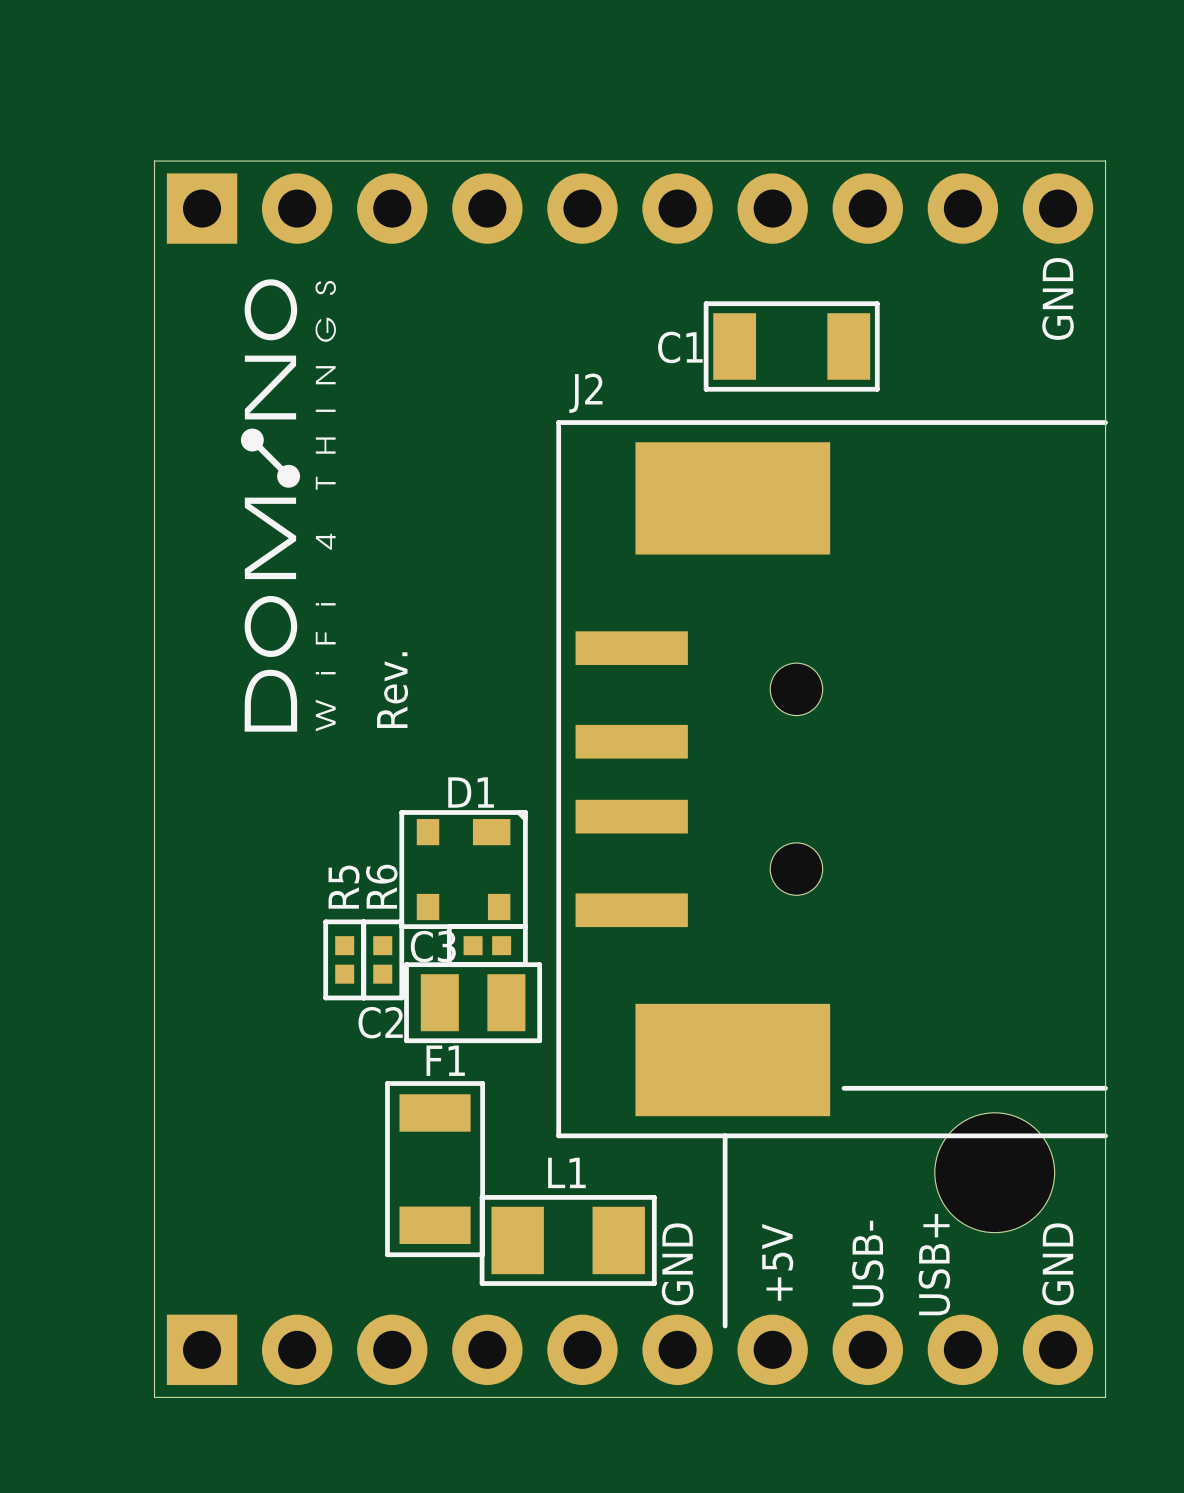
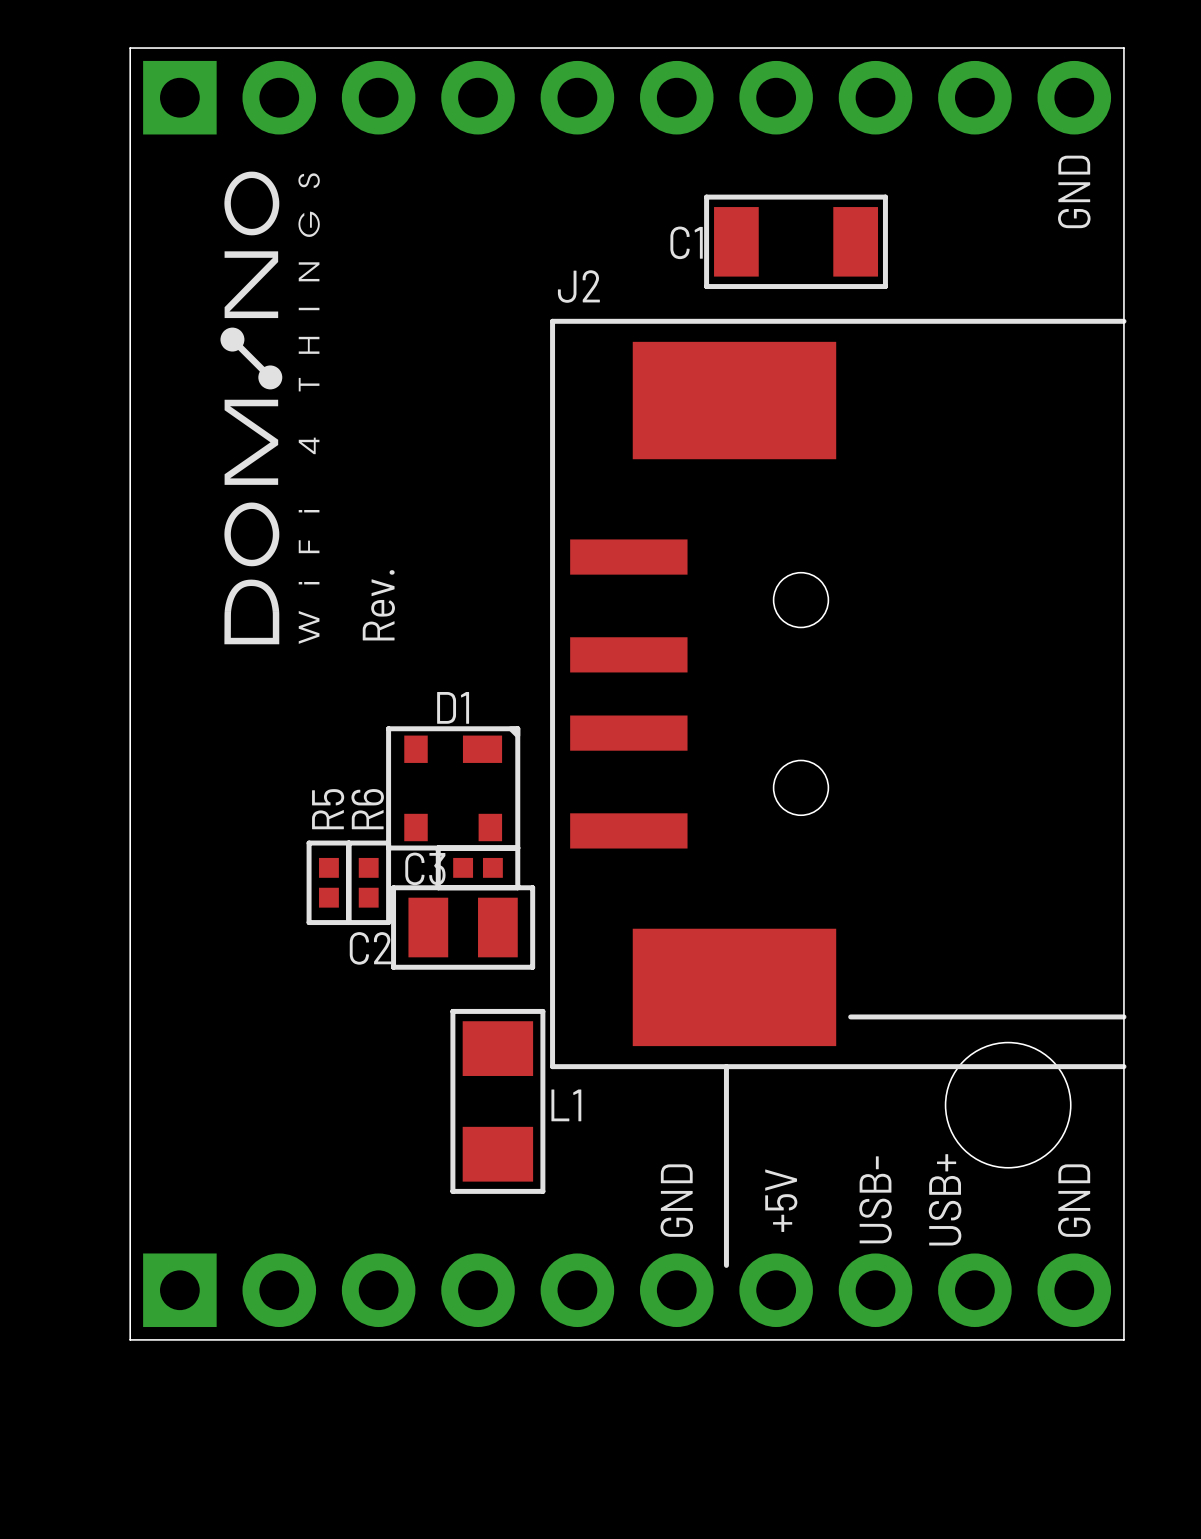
F1: (435, 1169) -> none
L1 rotation: 0° (568, 1240) -> 90° clockwise (497, 1101)

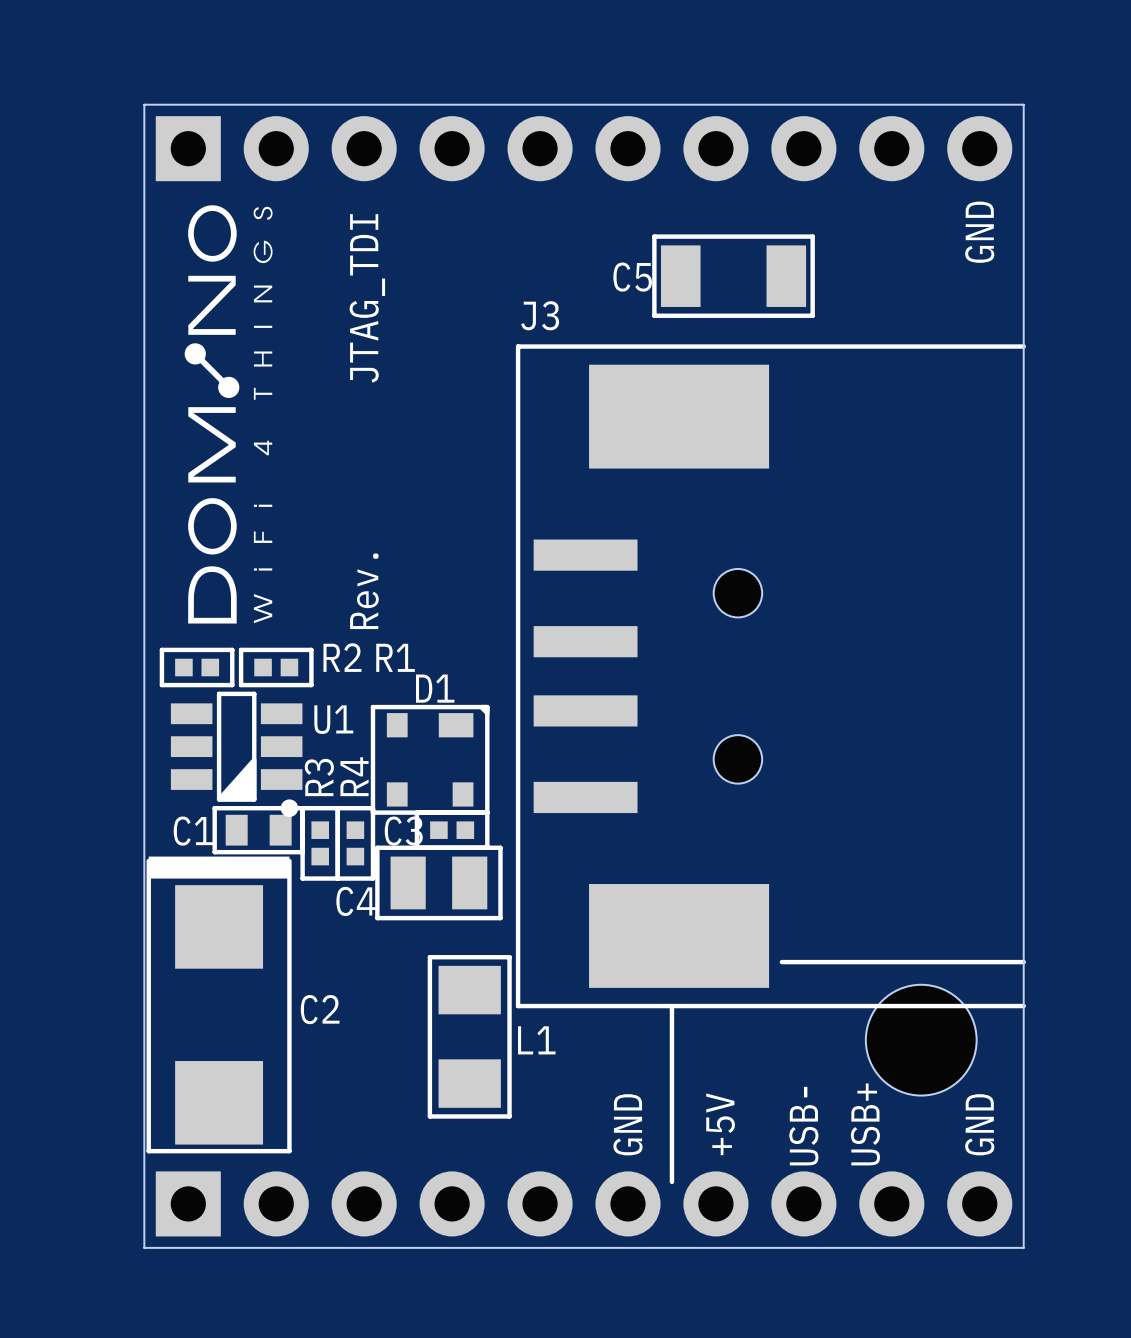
C1 name: C1 (686, 242) -> C5 (632, 277)
text: none -> JTAG_TDI (367, 298)
J2 name: J2 (578, 286) -> J3 (540, 315)
drawing position: (270, 407) -> (228, 414)
R2: none -> (197, 667)
R1: none -> (276, 667)
U1: none -> (236, 754)
R5 name: R5 (328, 809) -> R3 (319, 777)
R6 name: R6 (367, 809) -> R4 (354, 776)
C1: none -> (258, 830)
C2 name: C2 (370, 948) -> C4 (356, 901)
C2: none -> (219, 1004)

